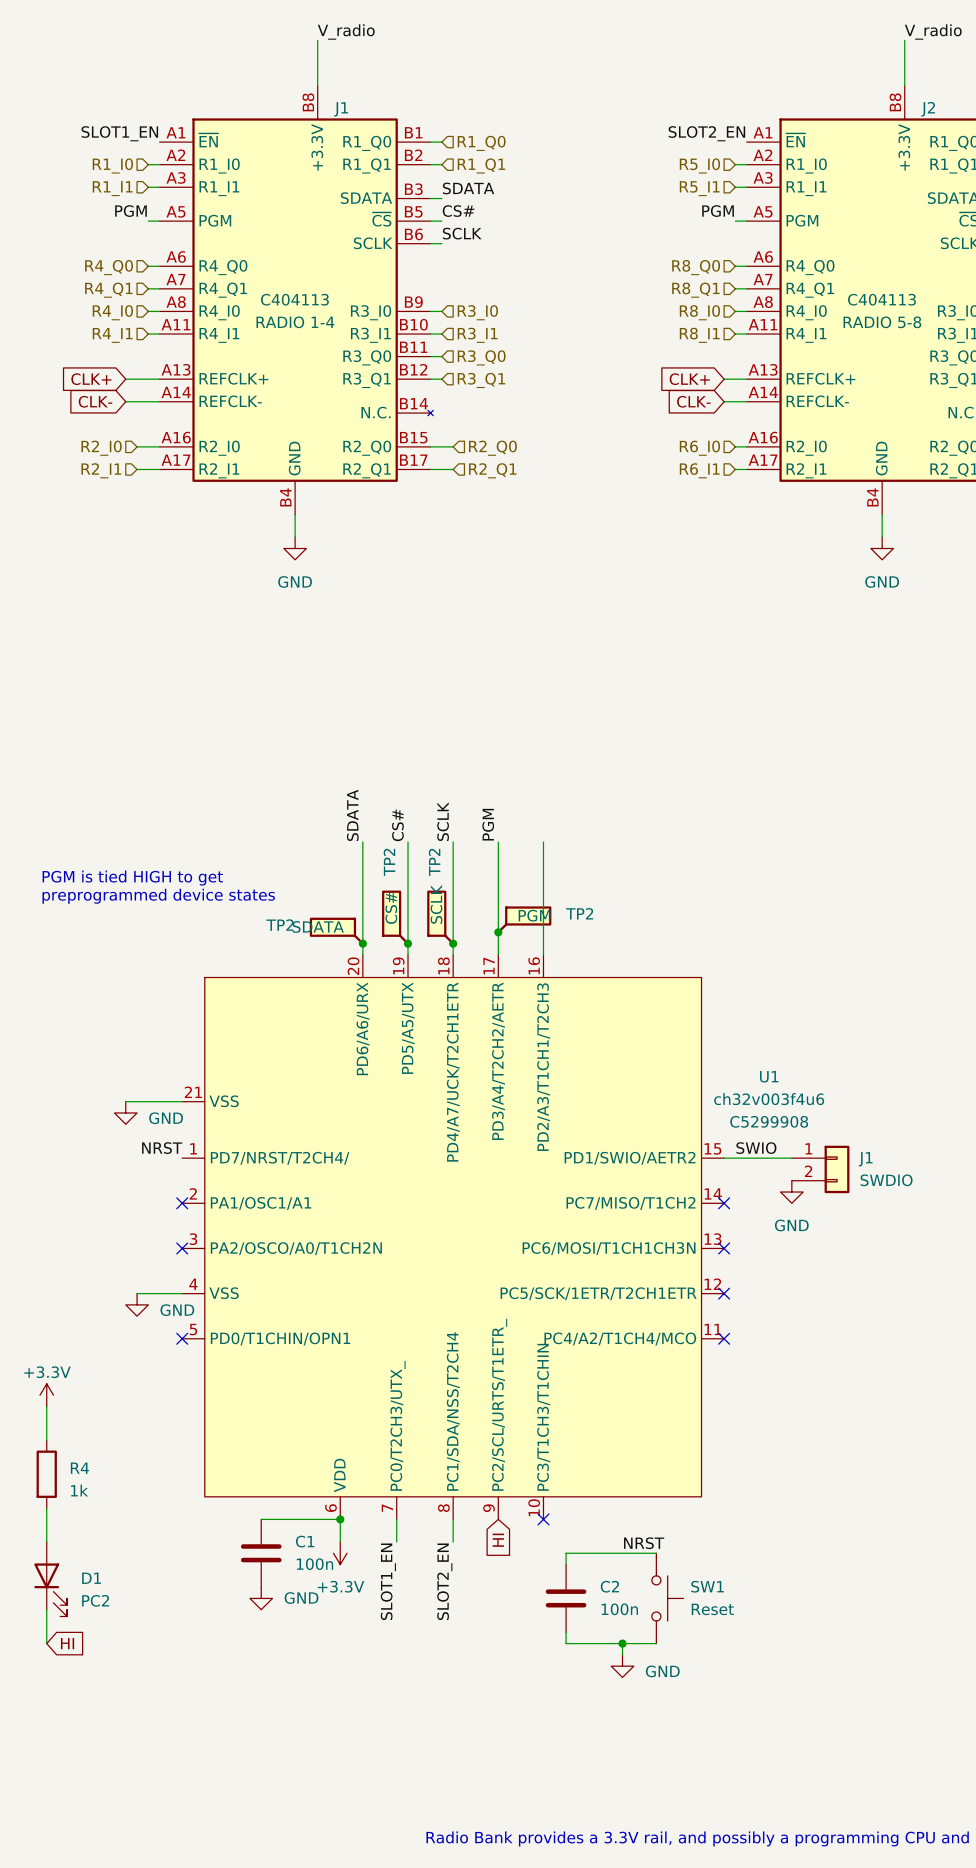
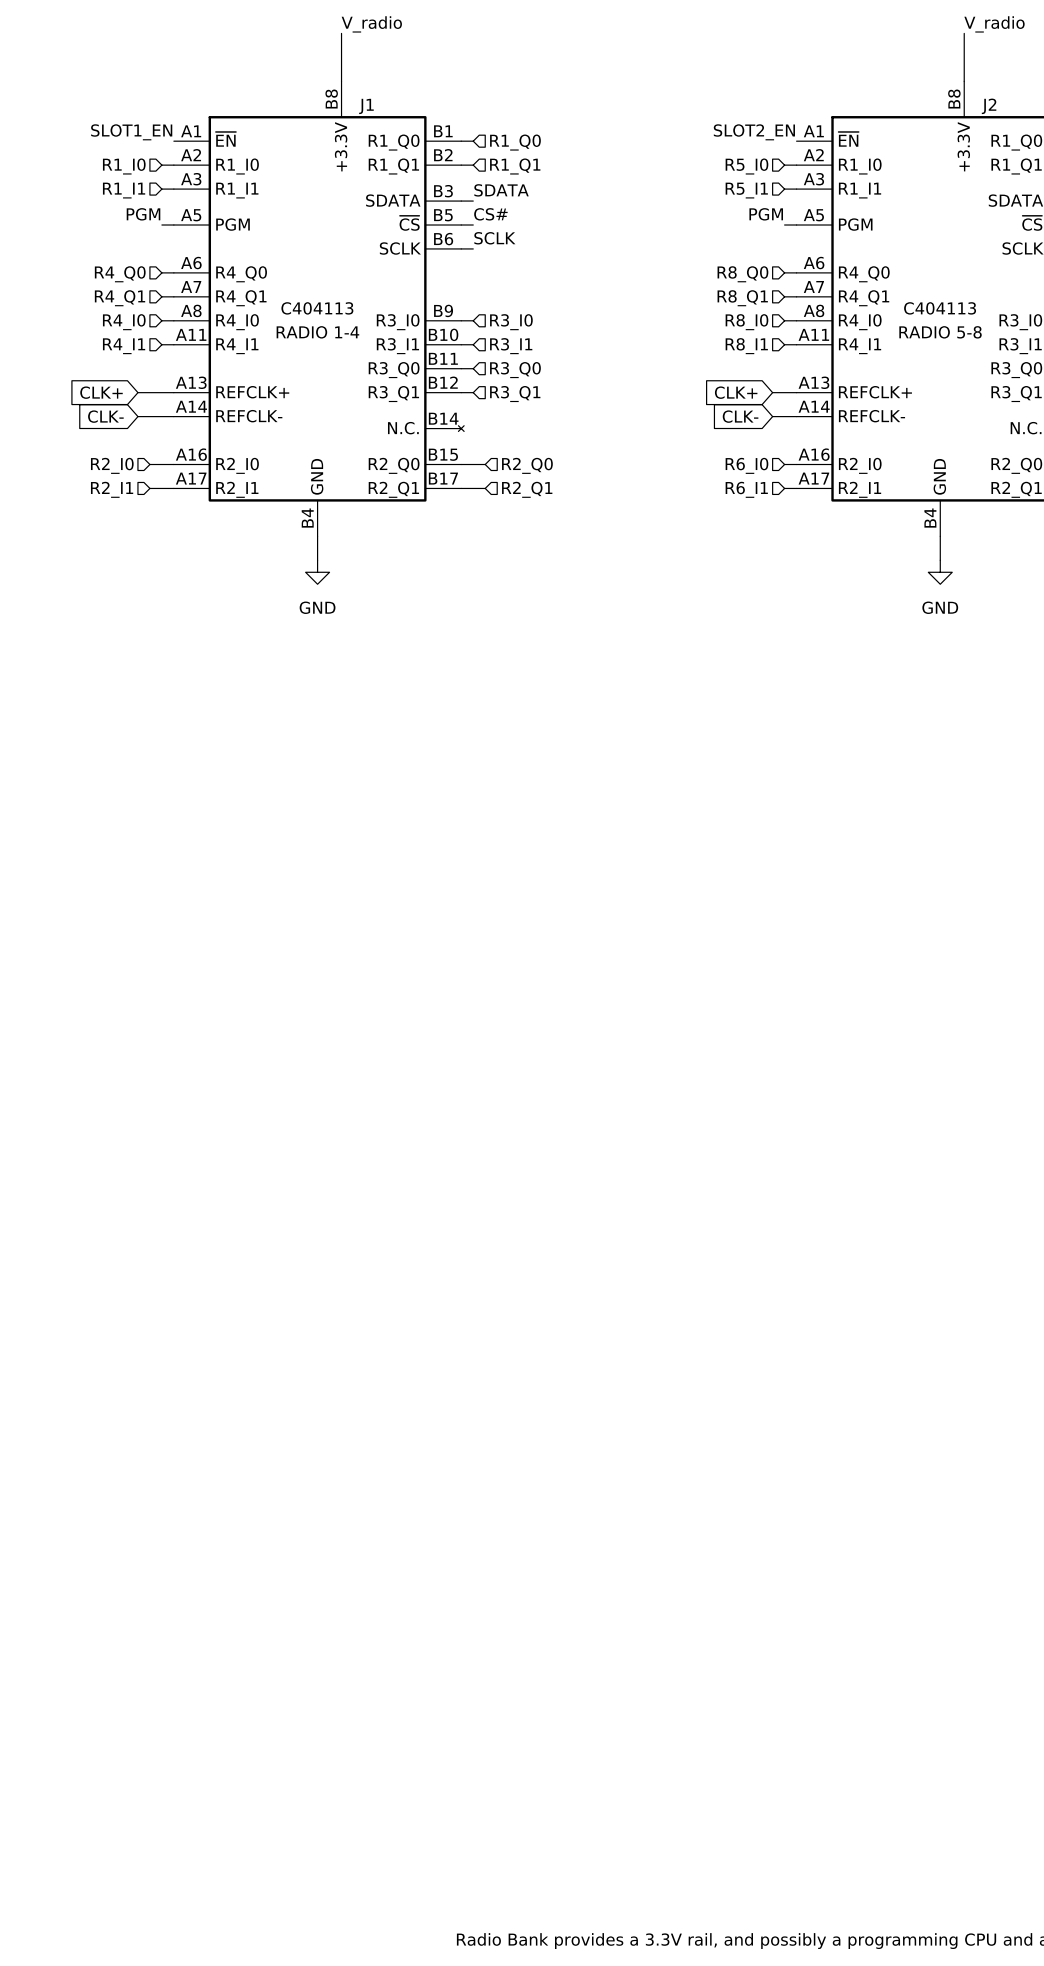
label: SDATA (352, 815) -> none
label: SCLK (443, 821) -> none
label: PGM (488, 824) -> none
label: CS# (397, 825) -> none
wire: (362, 842) (362, 954) -> none
wire: (408, 842) (408, 954) -> none
wire: (453, 842) (453, 954) -> none
wire: (498, 842) (498, 954) -> none
wire: (543, 842) (543, 954) -> none
text: PGM is tied HIGH to get (132, 878) -> none
text: preprogrammed device states (158, 896) -> none
TP2: CS# (395, 917) -> none
TP2: SCLK (440, 917) -> none
TP2: PGM (524, 919) -> none
TP2: SDATA (336, 931) -> none
junction: (498, 932) -> none
junction: (362, 943) -> none
junction: (408, 943) -> none
junction: (453, 943) -> none
wire: (125, 1101) (182, 1101) -> none
power symbol: GND (125, 1112) -> none
label: NRST (162, 1148) -> none
label: SWIO (756, 1148) -> none
wire: (724, 1158) (791, 1158) -> none
J1: SWDIO (820, 1169) -> none
power symbol: GND (791, 1192) -> none
no-connect mark: (182, 1203) -> none
no-connect mark: (724, 1203) -> none
U1: ch32v003f4u6 (453, 1237) -> none
no-connect mark: (182, 1248) -> none
no-connect mark: (724, 1248) -> none
wire: (137, 1293) (182, 1293) -> none
no-connect mark: (724, 1293) -> none
power symbol: GND (137, 1304) -> none
no-connect mark: (182, 1338) -> none
no-connect mark: (724, 1338) -> none
power symbol: +3.3V (46, 1395) -> none
wire: (46, 1406) (46, 1440) -> none
R4: 1k (46, 1474) -> none
wire: (46, 1508) (46, 1541) -> none
wire: (261, 1519) (340, 1519) (340, 1541) -> none
junction: (340, 1519) -> none
wire: (396, 1519) (396, 1541) -> none
wire: (453, 1519) (453, 1541) -> none
no-connect mark: (543, 1519) -> none
global label: HI (498, 1540) -> none
label: NRST (644, 1543) -> none
C1: 100n (261, 1553) -> none
power symbol: +3.3V (340, 1553) -> none
wire: (656, 1553) (566, 1553) (566, 1564) -> none
D1: PC2 (50, 1579) -> none
label: SLOT1_EN (388, 1581) -> none
label: SLOT2_EN (444, 1581) -> none
power symbol: GND (261, 1598) -> none
C2: 100n (566, 1598) -> none
SW1: Reset (667, 1598) -> none
wire: (46, 1609) (46, 1643) -> none
wire: (566, 1632) (566, 1643) (656, 1643) -> none
global label: HI (67, 1643) -> none
wire: (622, 1643) (622, 1654) -> none
junction: (622, 1643) -> none
power symbol: GND (622, 1666) -> none

